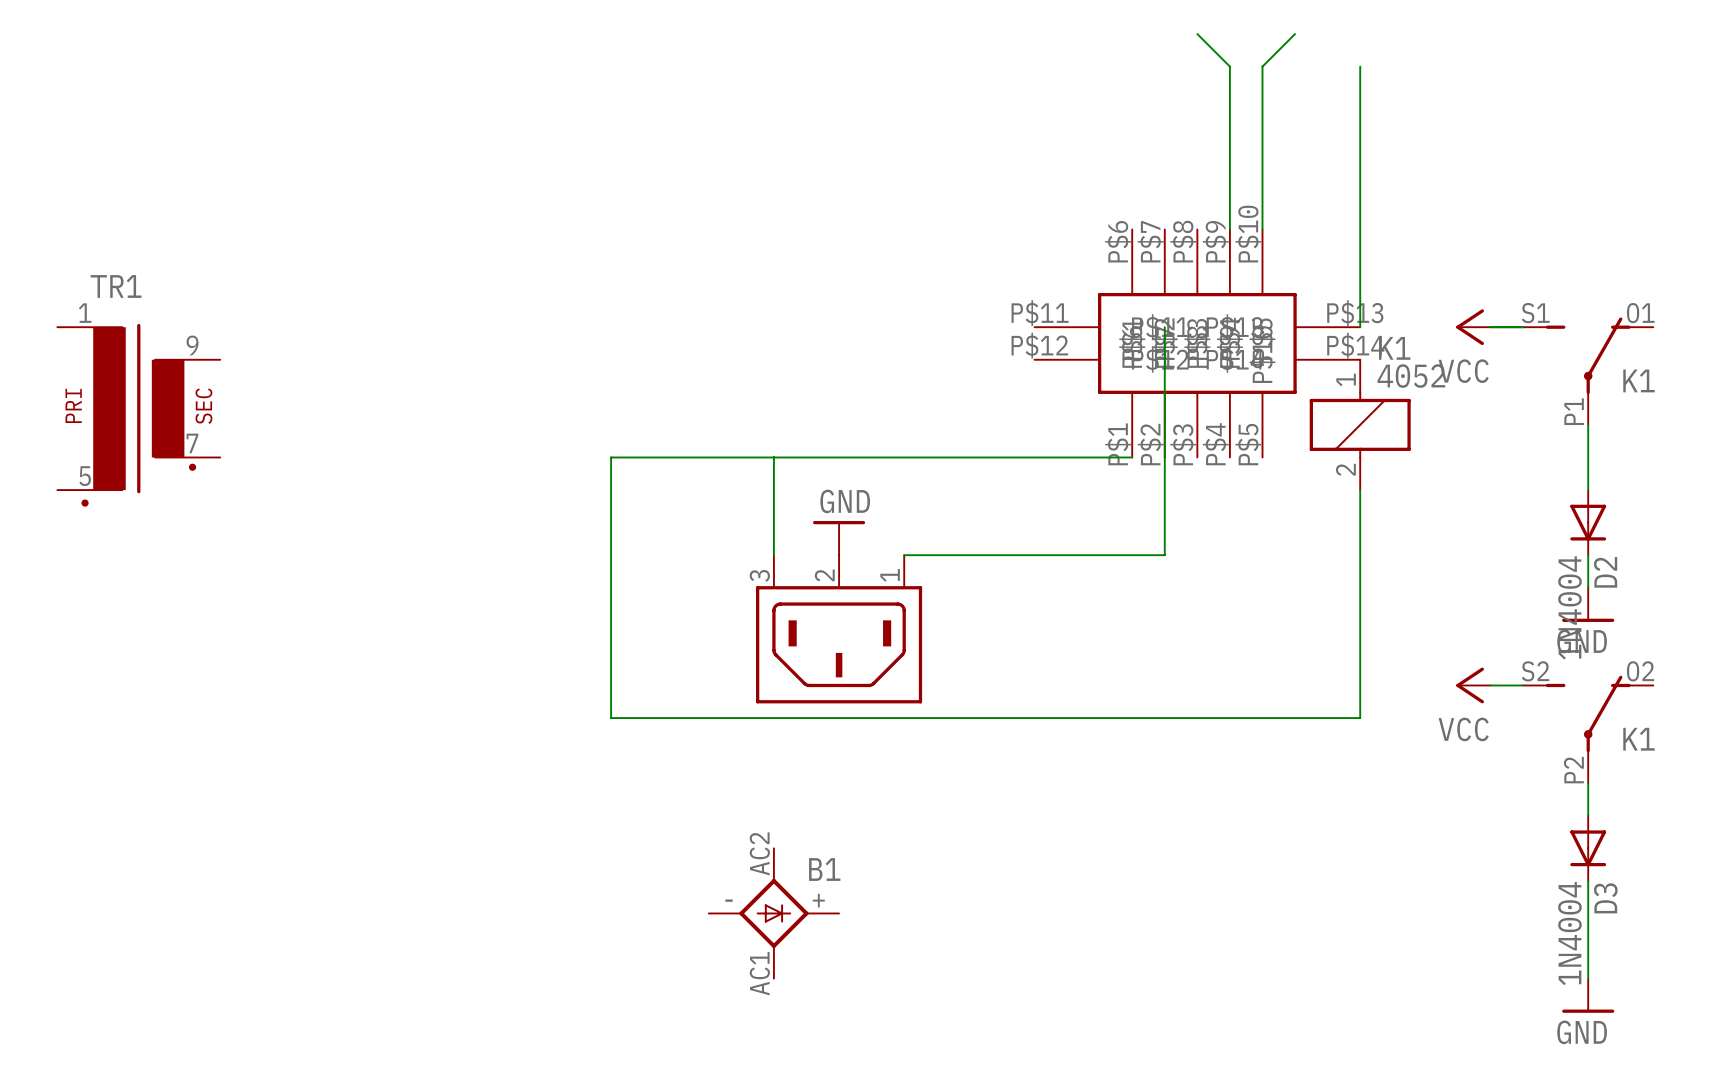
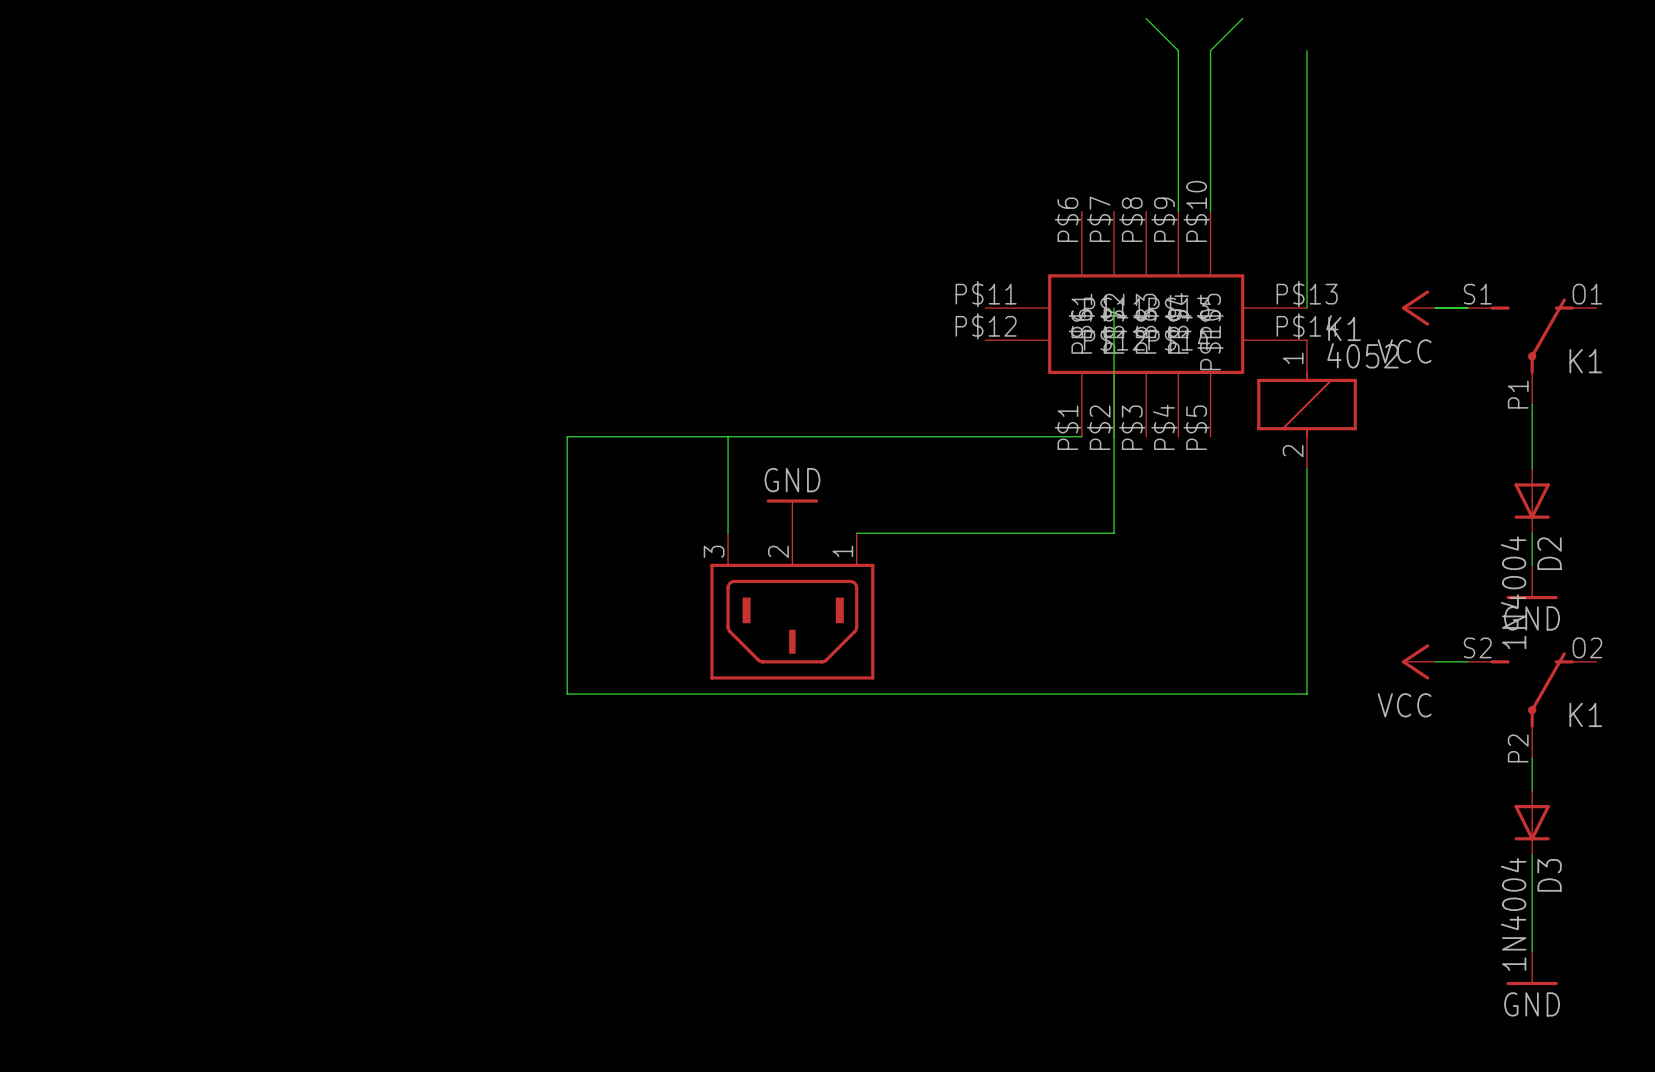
TR1: (138, 415) -> none
B1: (773, 913) -> none

